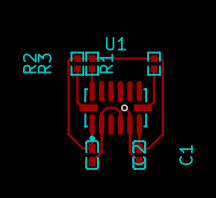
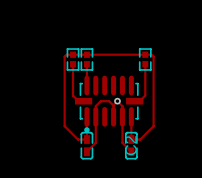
U1 name: U1 (115, 43) -> none
R2 name: R2 (29, 63) -> none
R3 name: R3 (44, 63) -> none
R1 name: R1 (106, 63) -> none
C1 name: C1 (185, 155) -> none

